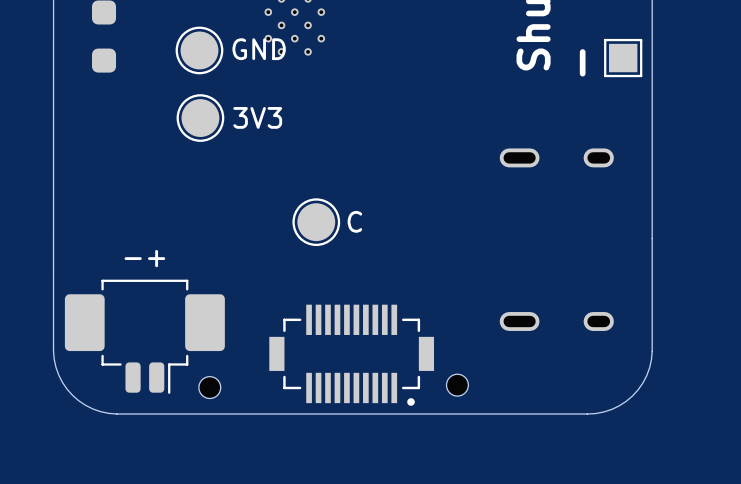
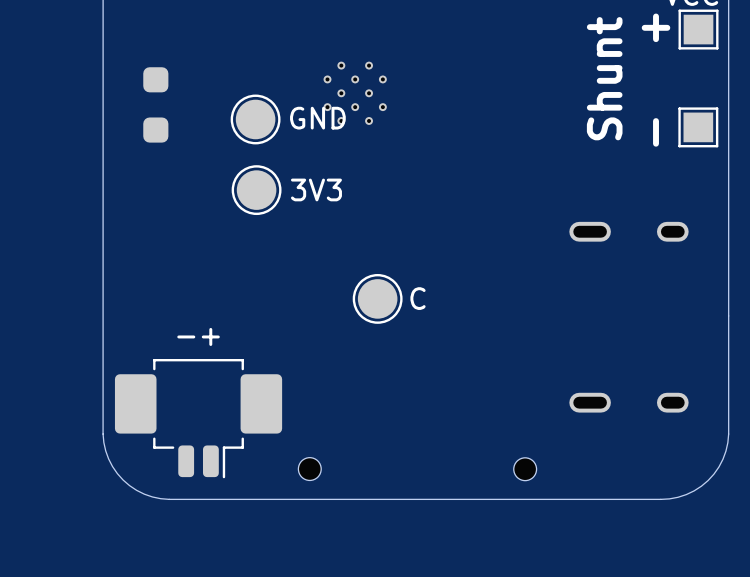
part: (351, 355) -> none
part position: (209, 387) -> (309, 469)

